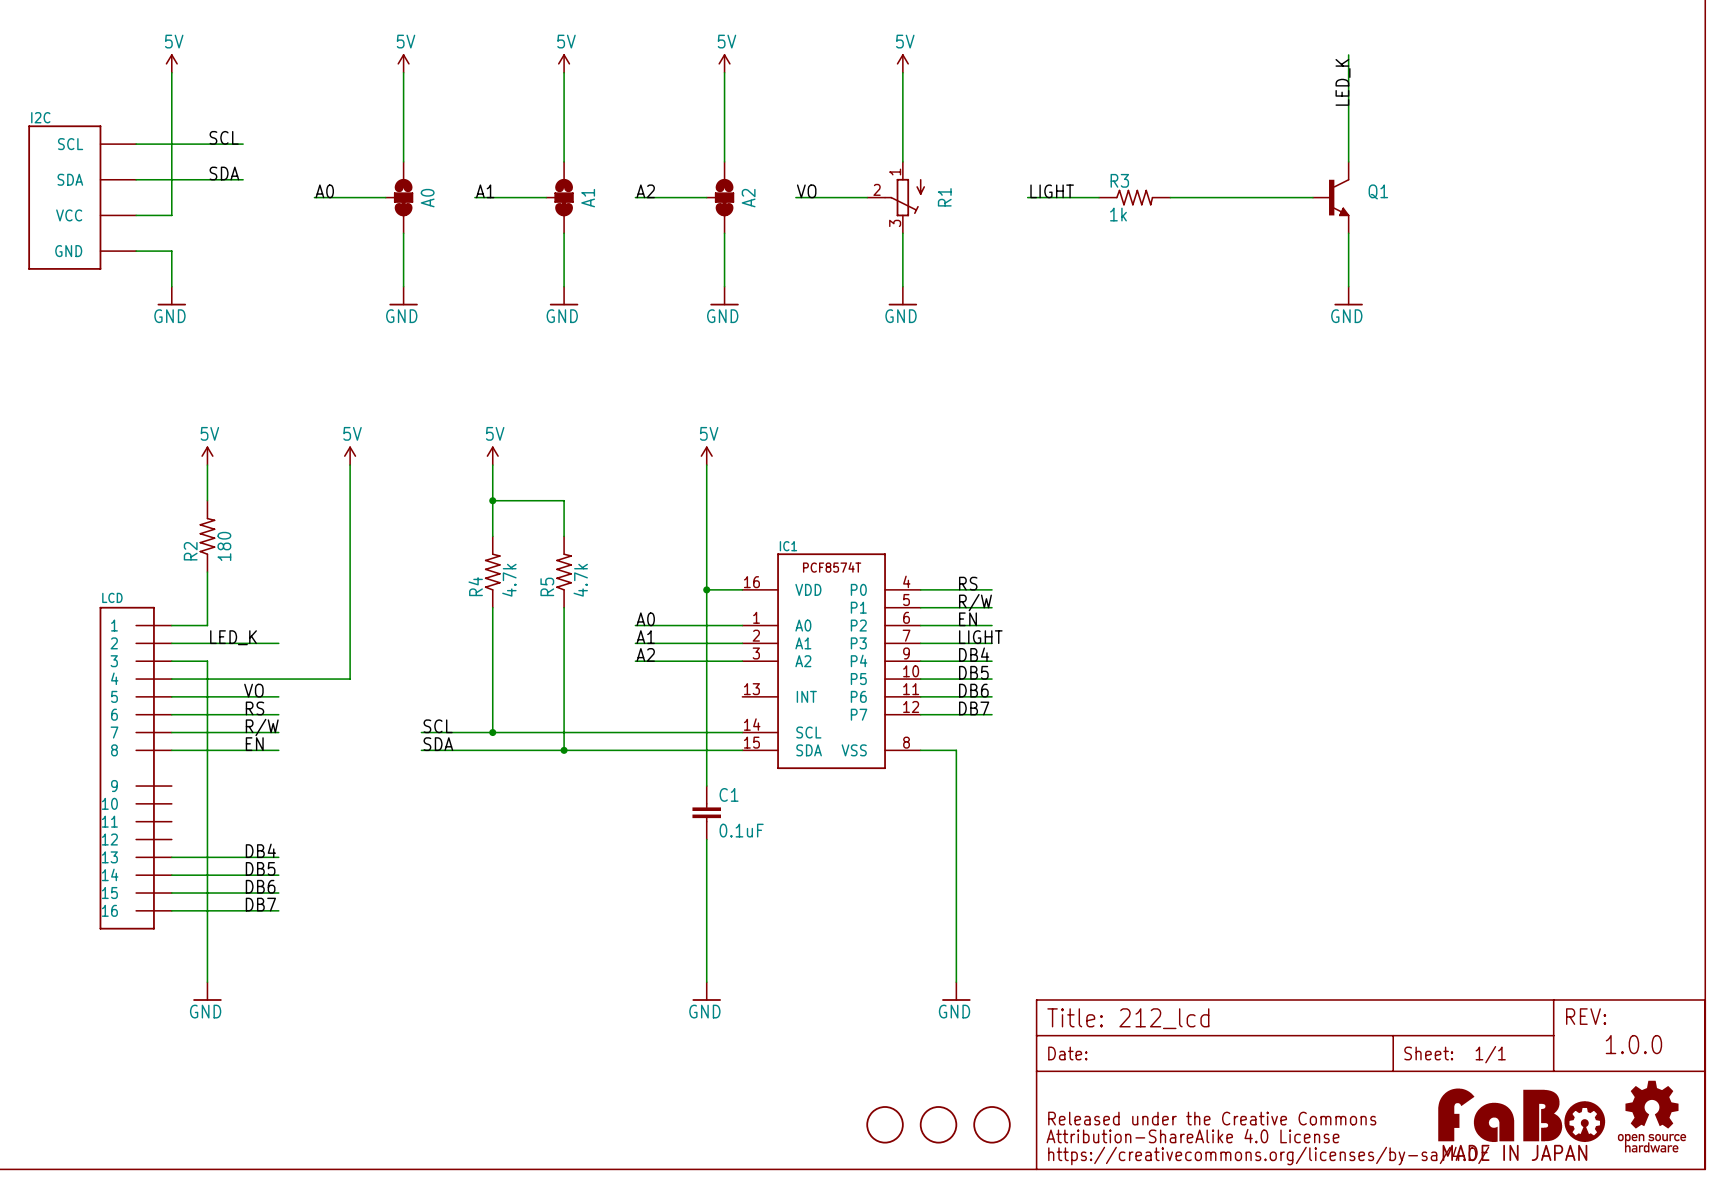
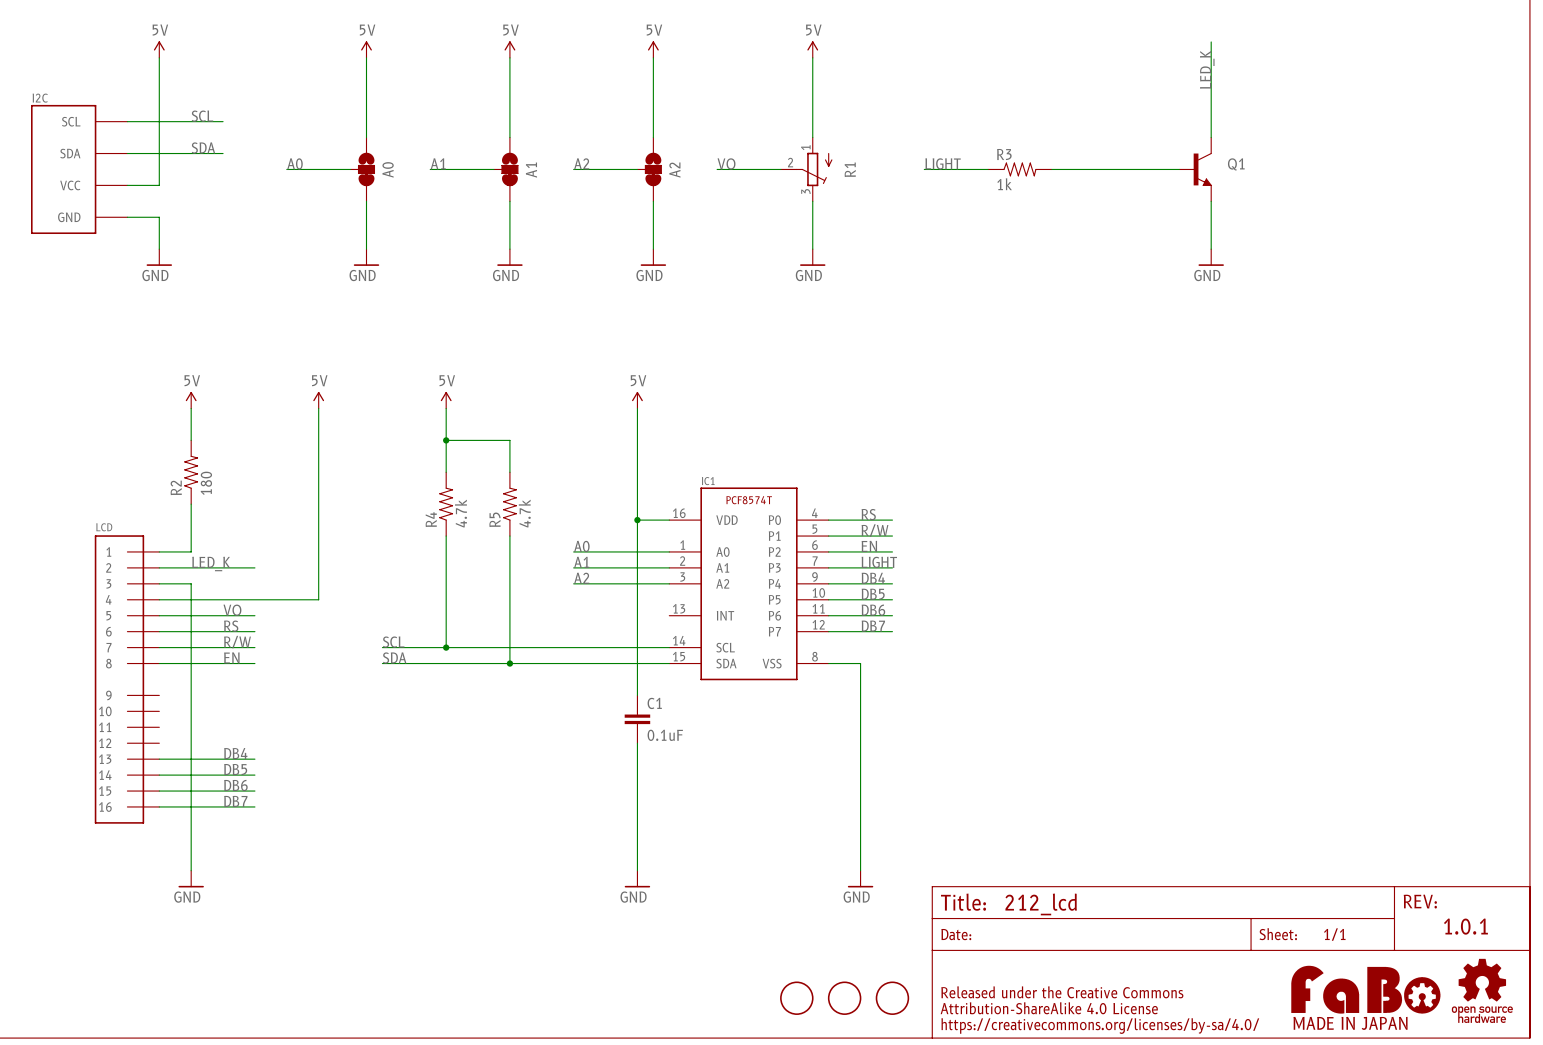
text: 1.0.0 (1633, 1044) -> 1.0.1 (1465, 926)

